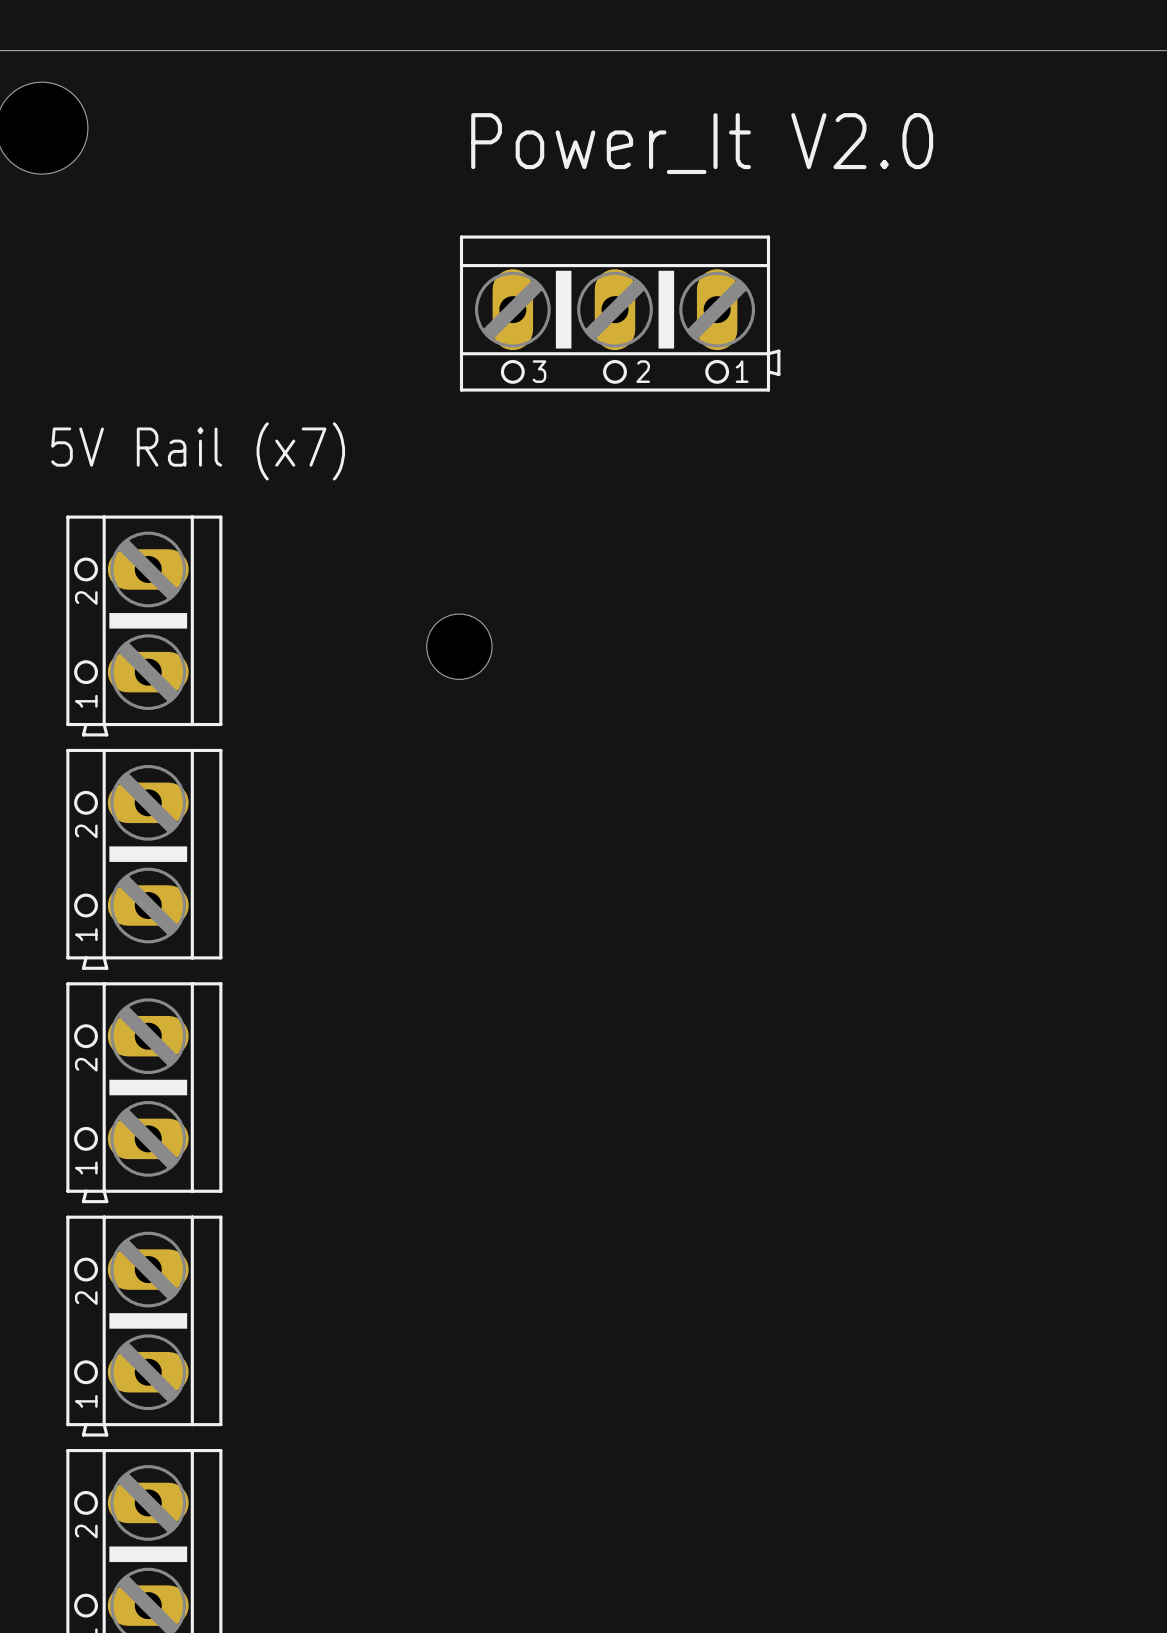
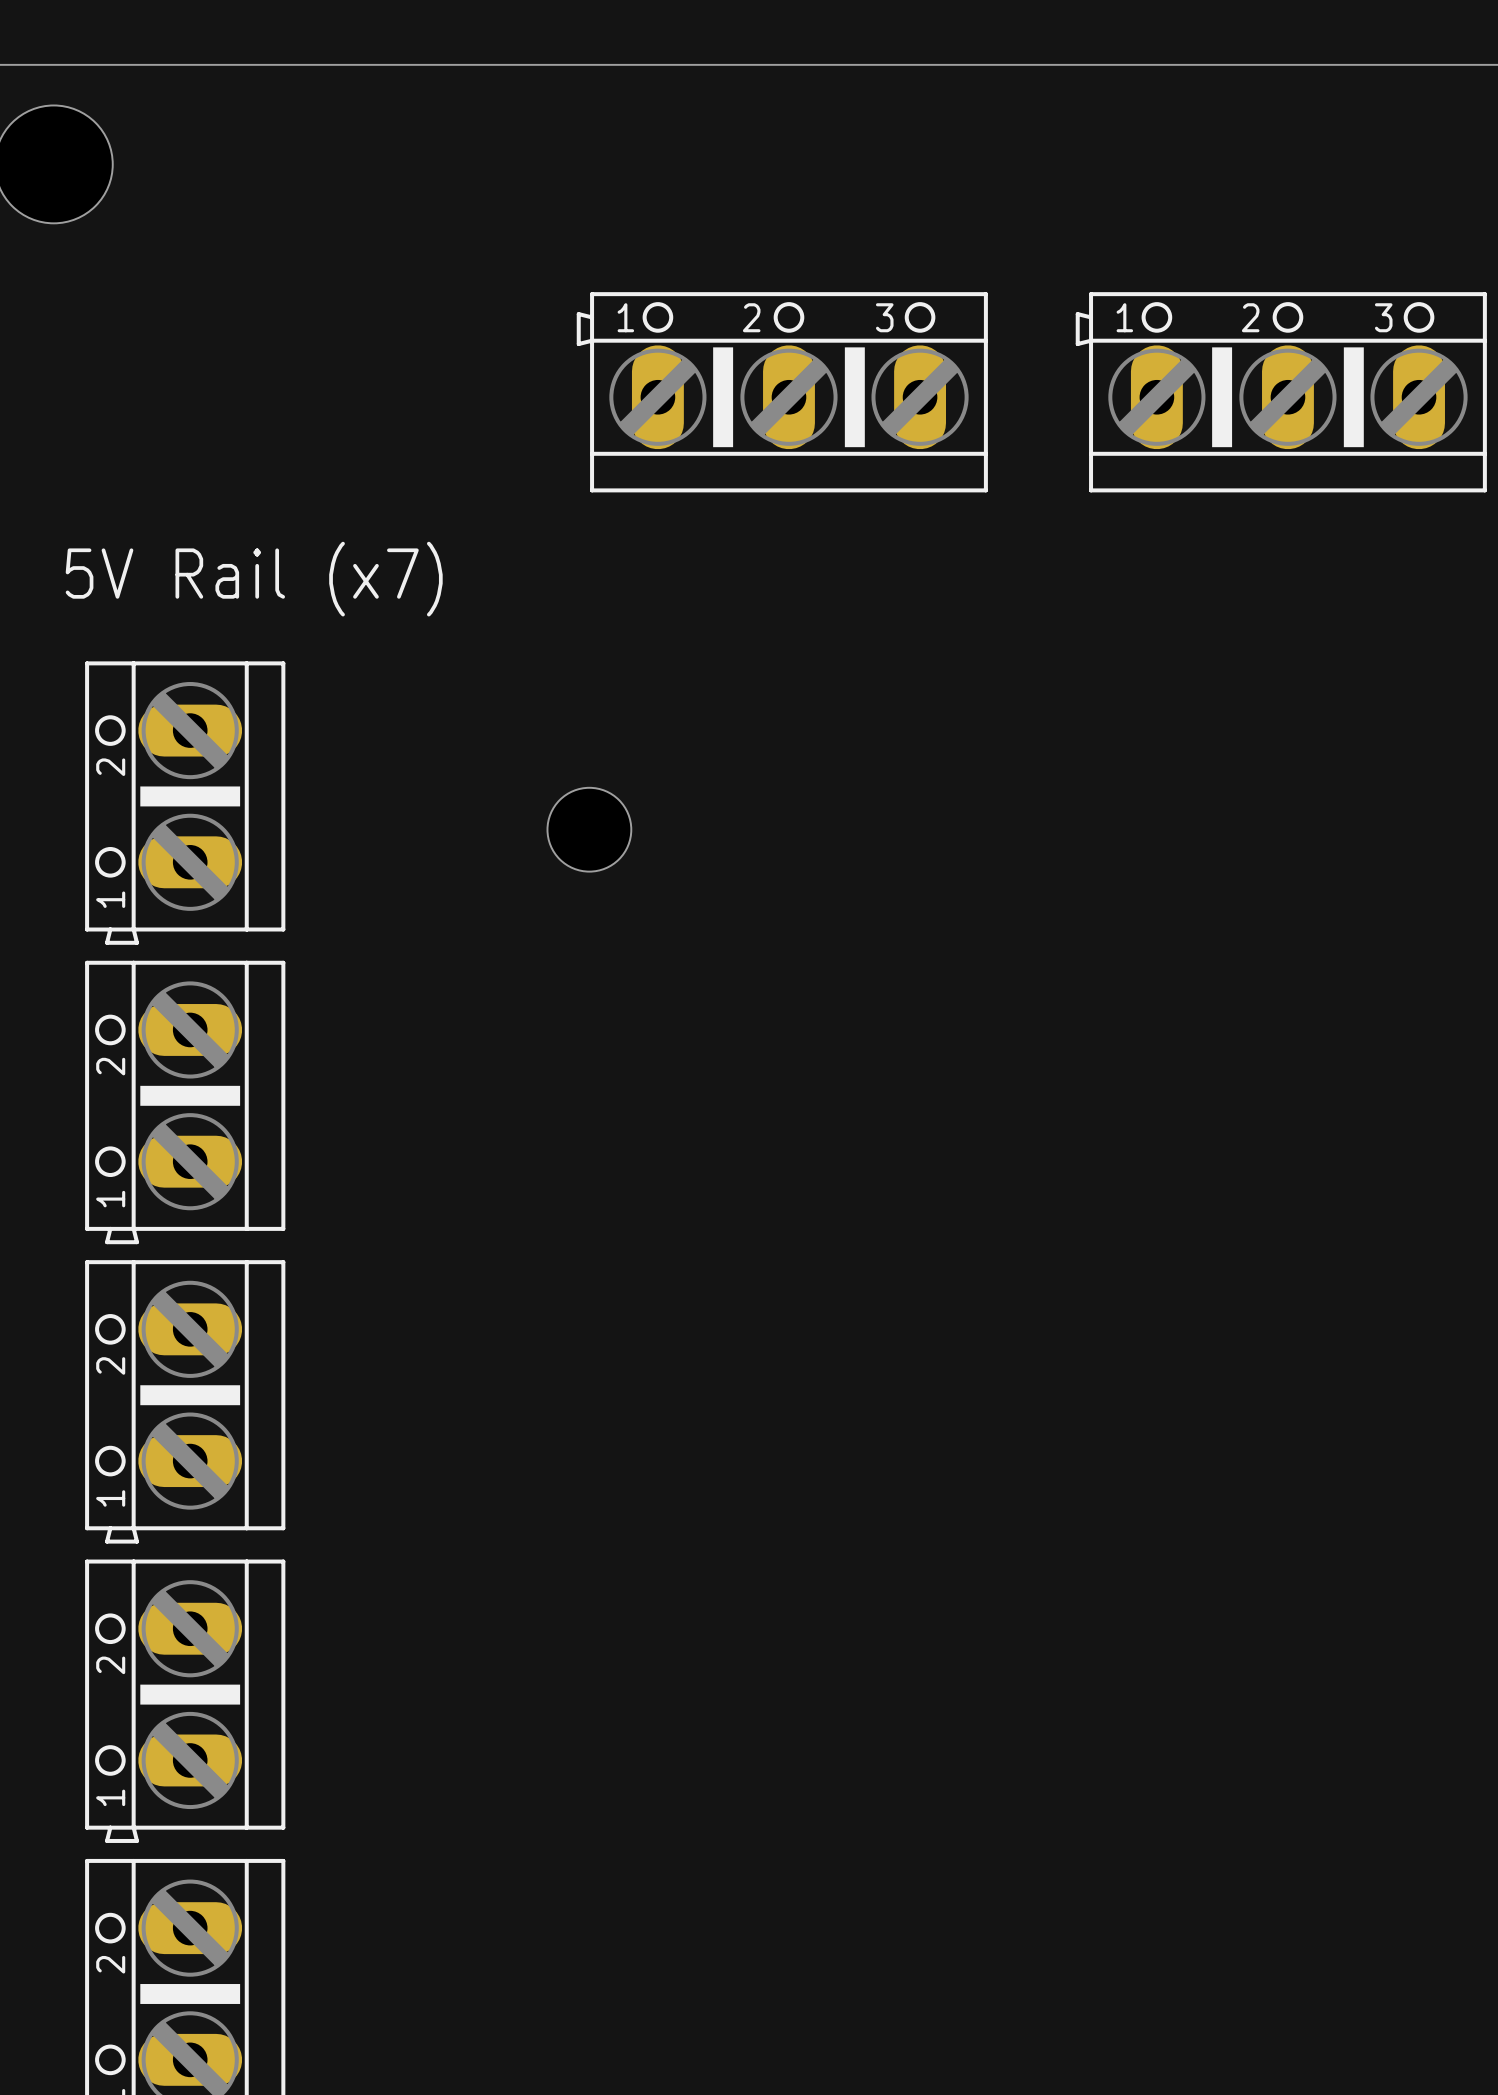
text: Power_It V2.0 (702, 143) -> none
part footprint: [459, 235, 781, 392] -> [576, 292, 988, 493]
part: none -> (1281, 392)

